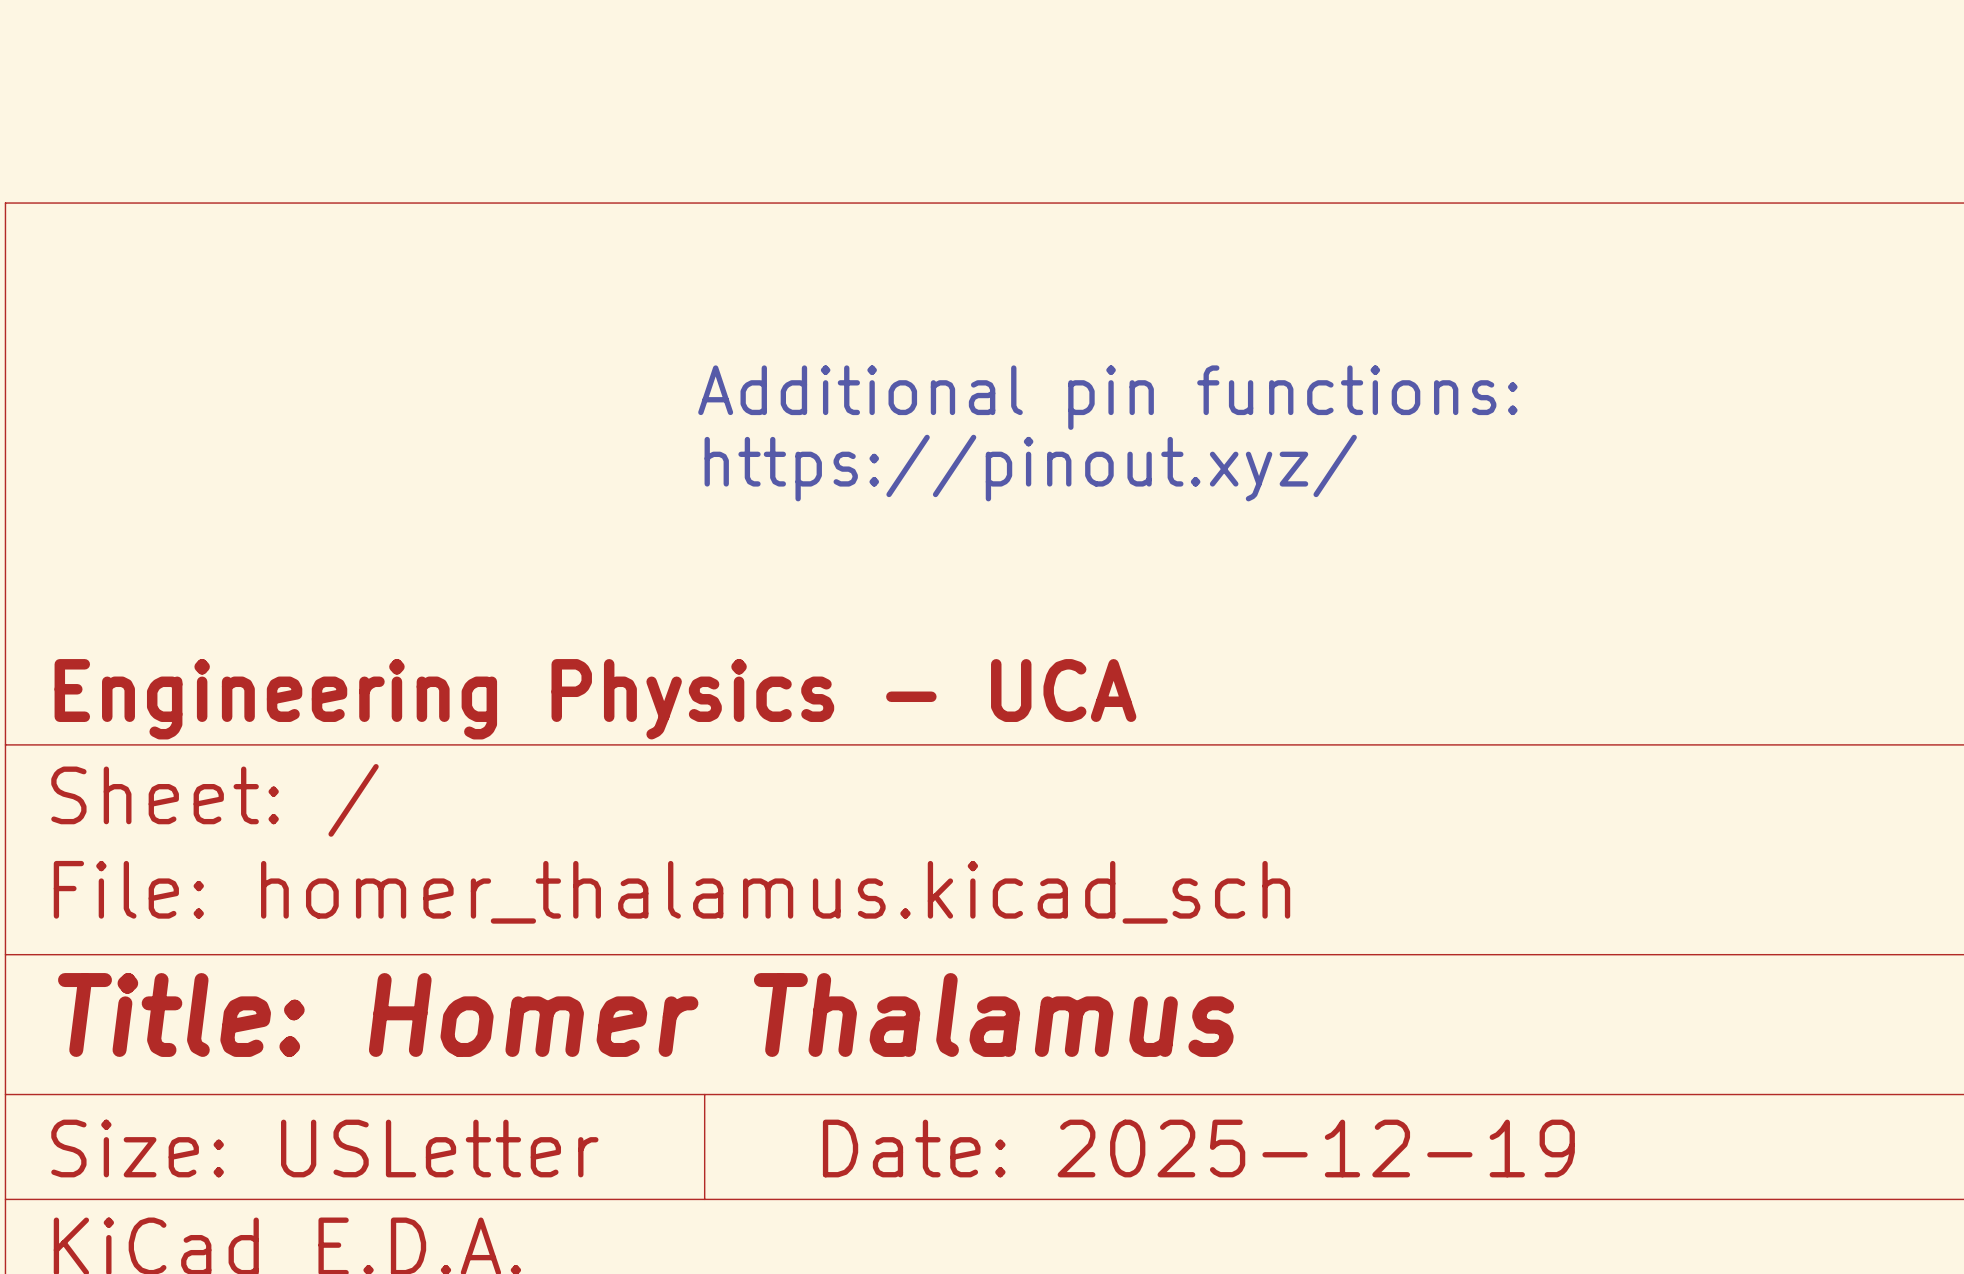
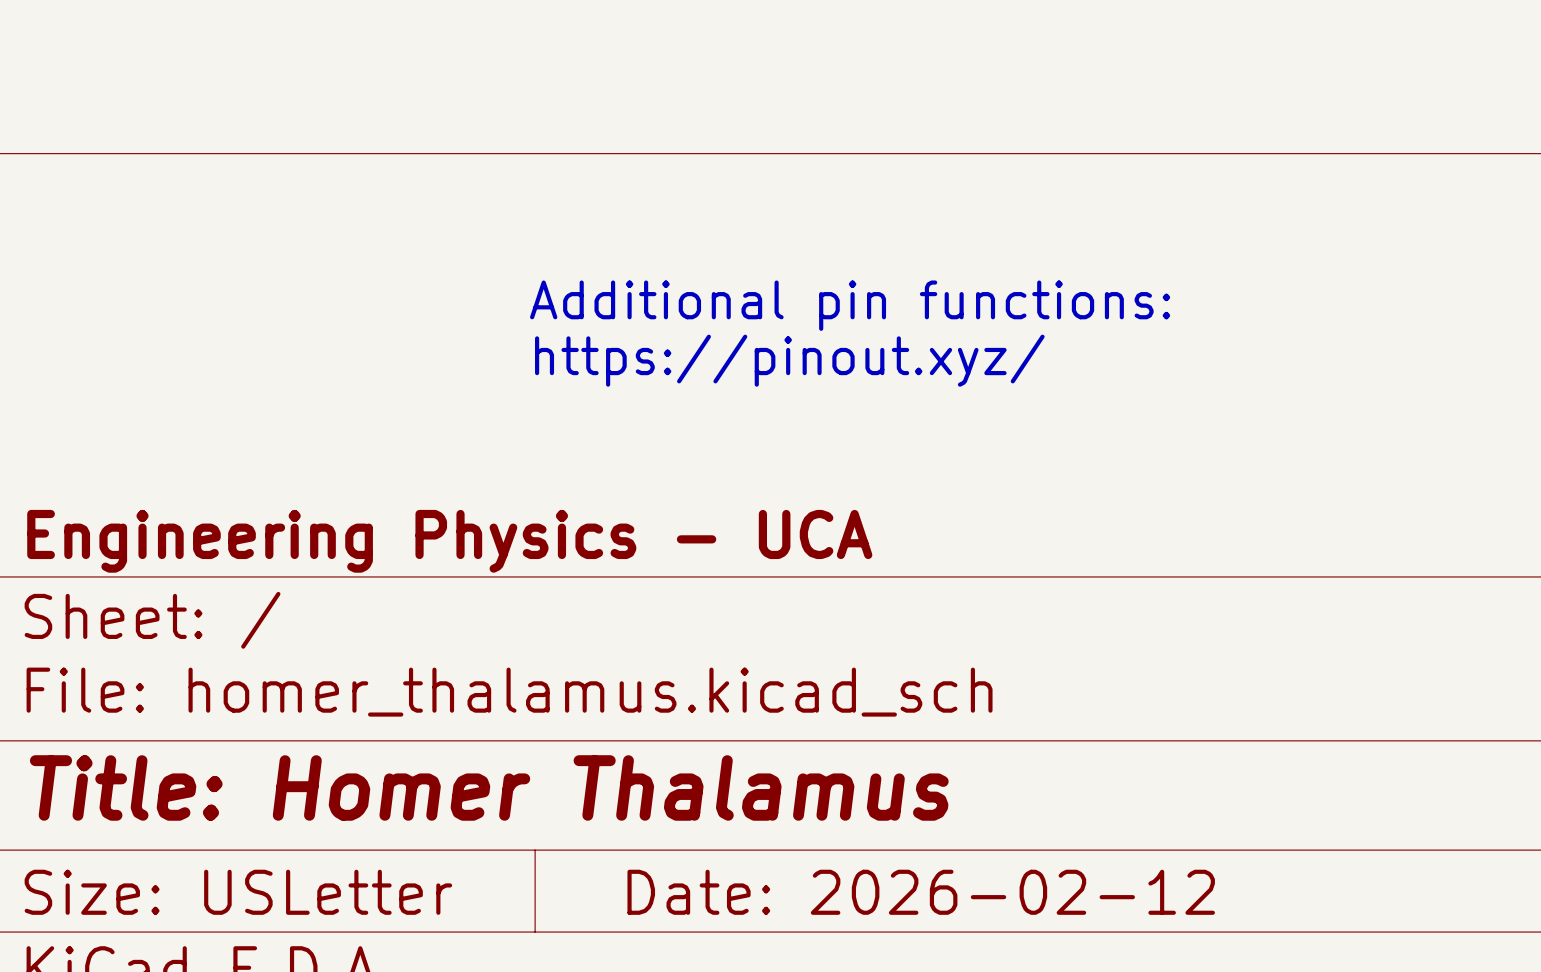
title block: Date: 2025-12-19 (1198, 1148) -> Date: 2026-02-12 (921, 892)

